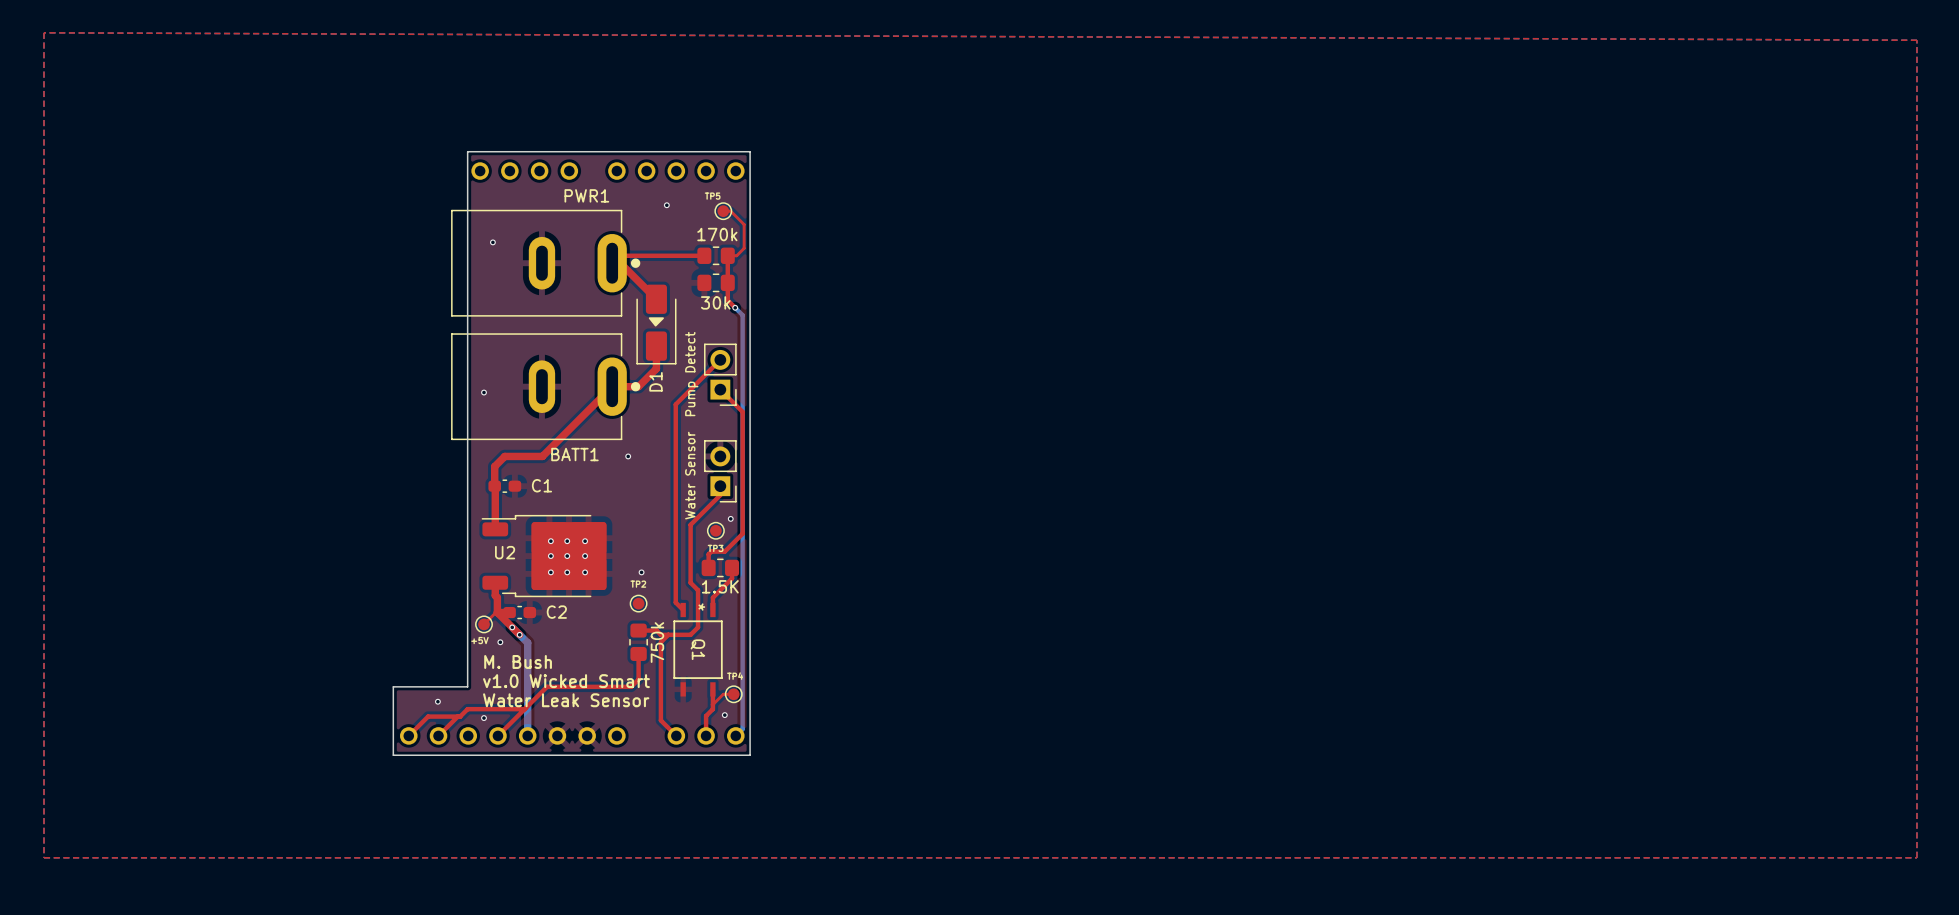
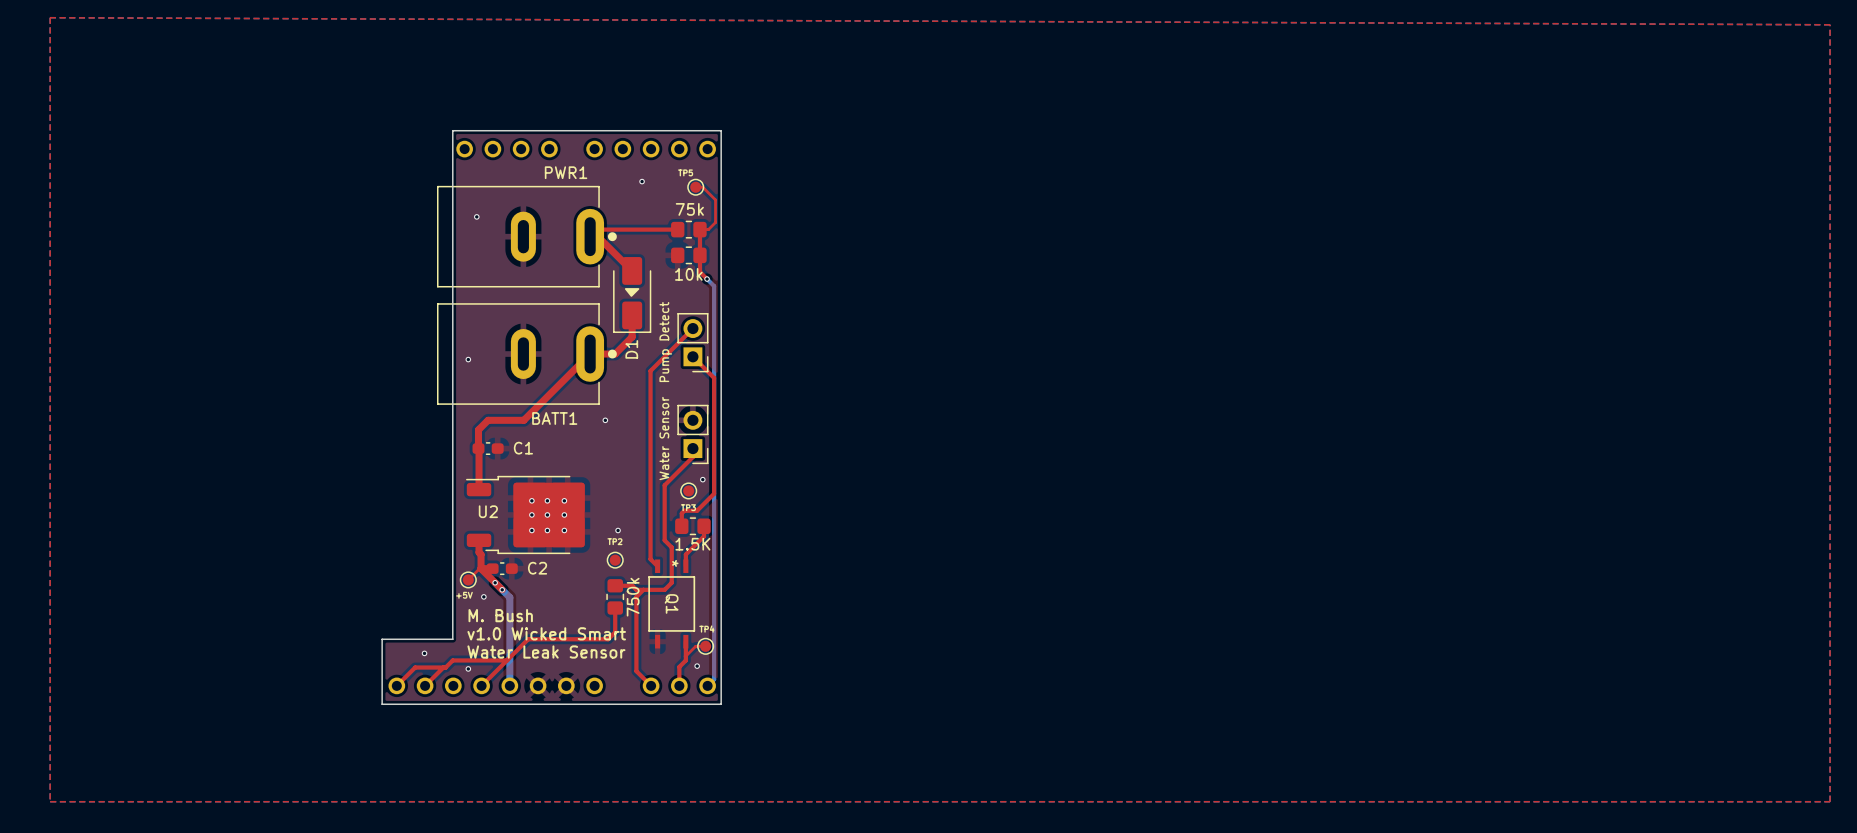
part value: 170k (717, 234) -> 75k (689, 209)
part value: 30k (715, 302) -> 10k (688, 274)

